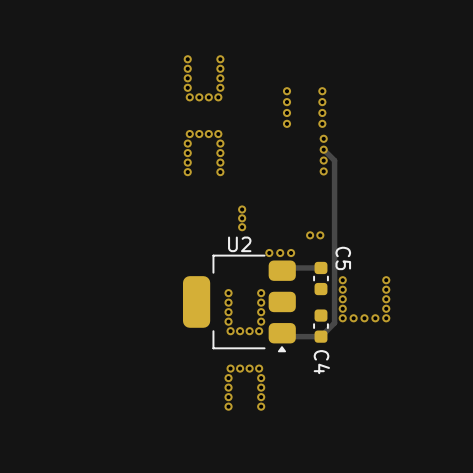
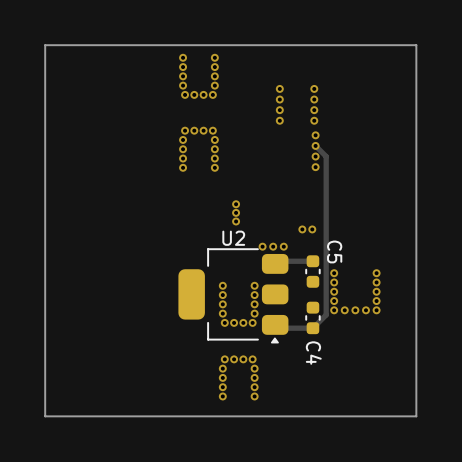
board edge: none -> (416, 45) (45, 45) (45, 416) (416, 416) (416, 45)

